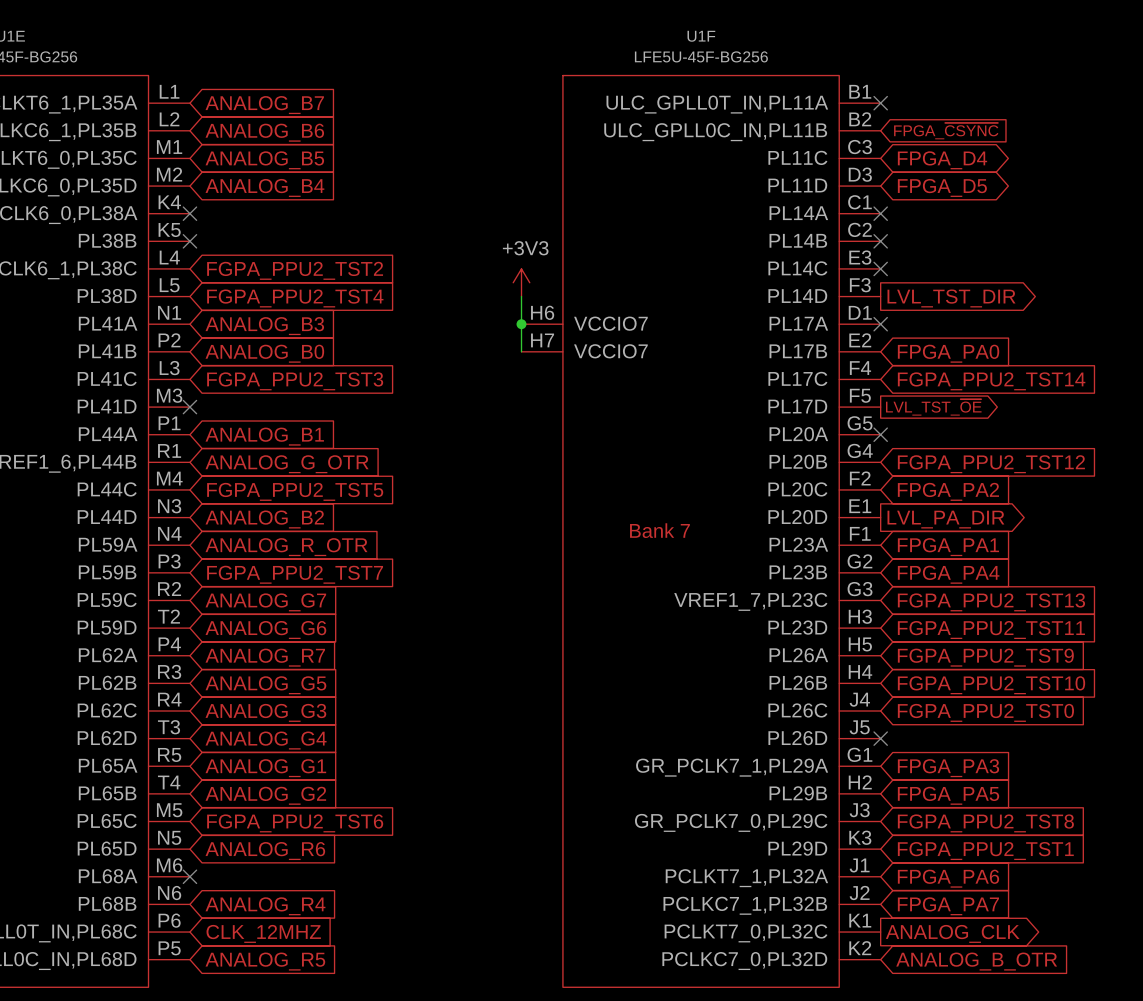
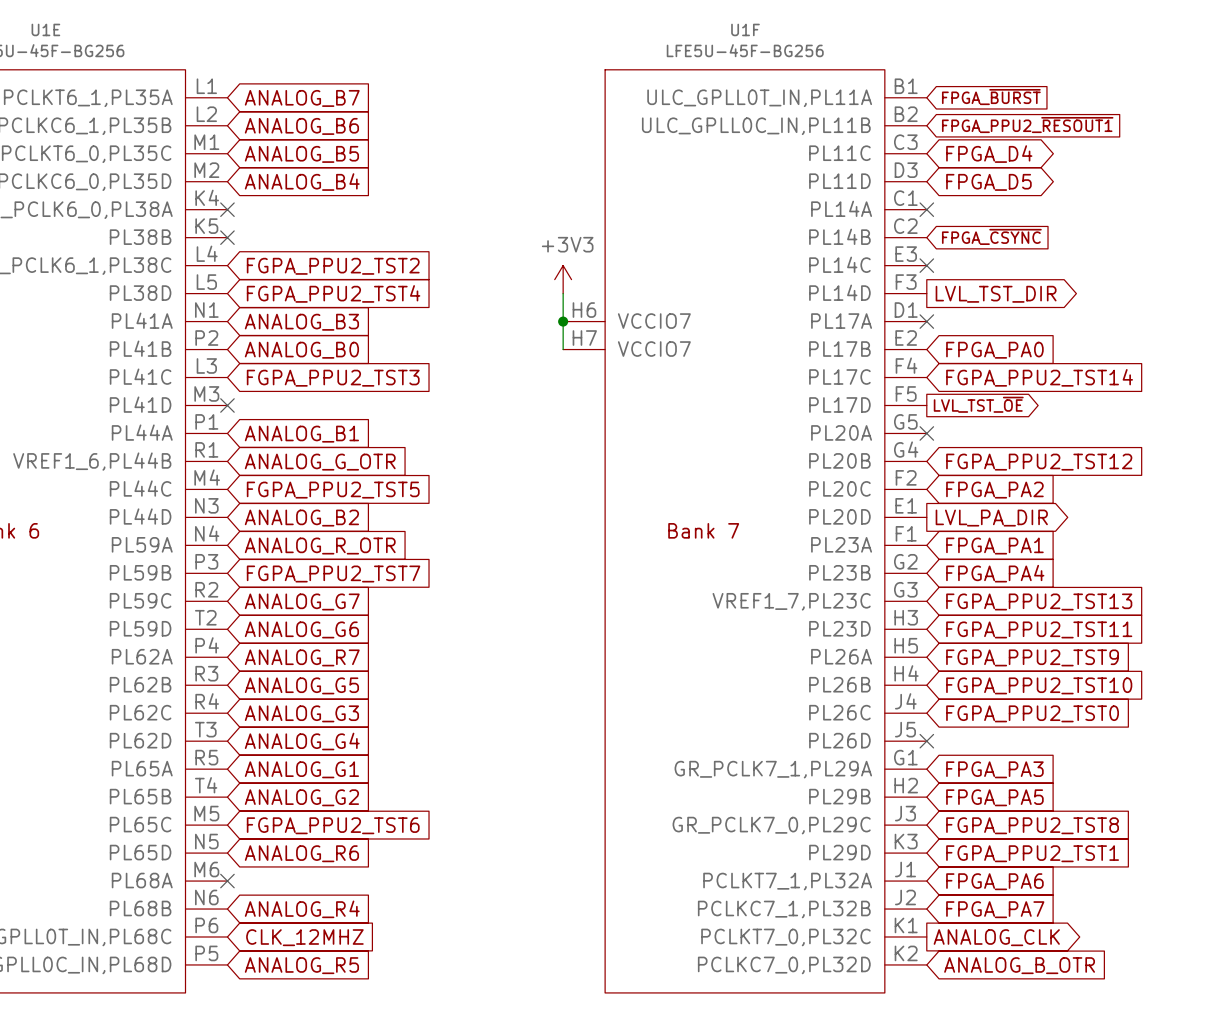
no-connect mark: (880, 103) -> none
global label: none -> FPGA_~{BURST} (991, 97)
global label: FPGA_~{CSYNC} (946, 131) -> FPGA_PPU2_~{RESOUT1} (1027, 125)
no-connect mark: (880, 241) -> none
global label: none -> FPGA_~{CSYNC} (991, 236)

